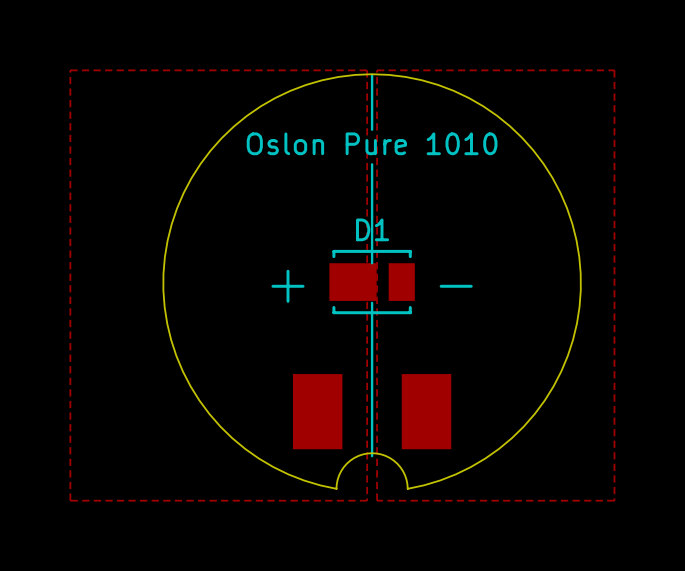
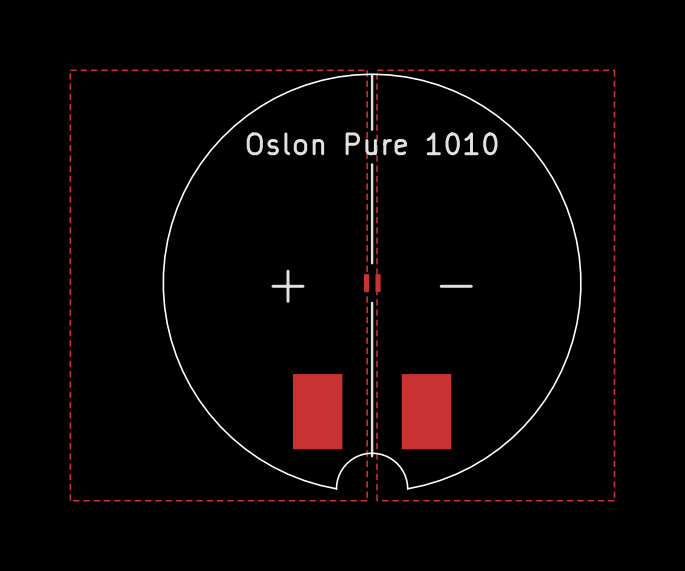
D1: (372, 282) -> none
part: none -> (372, 283)

